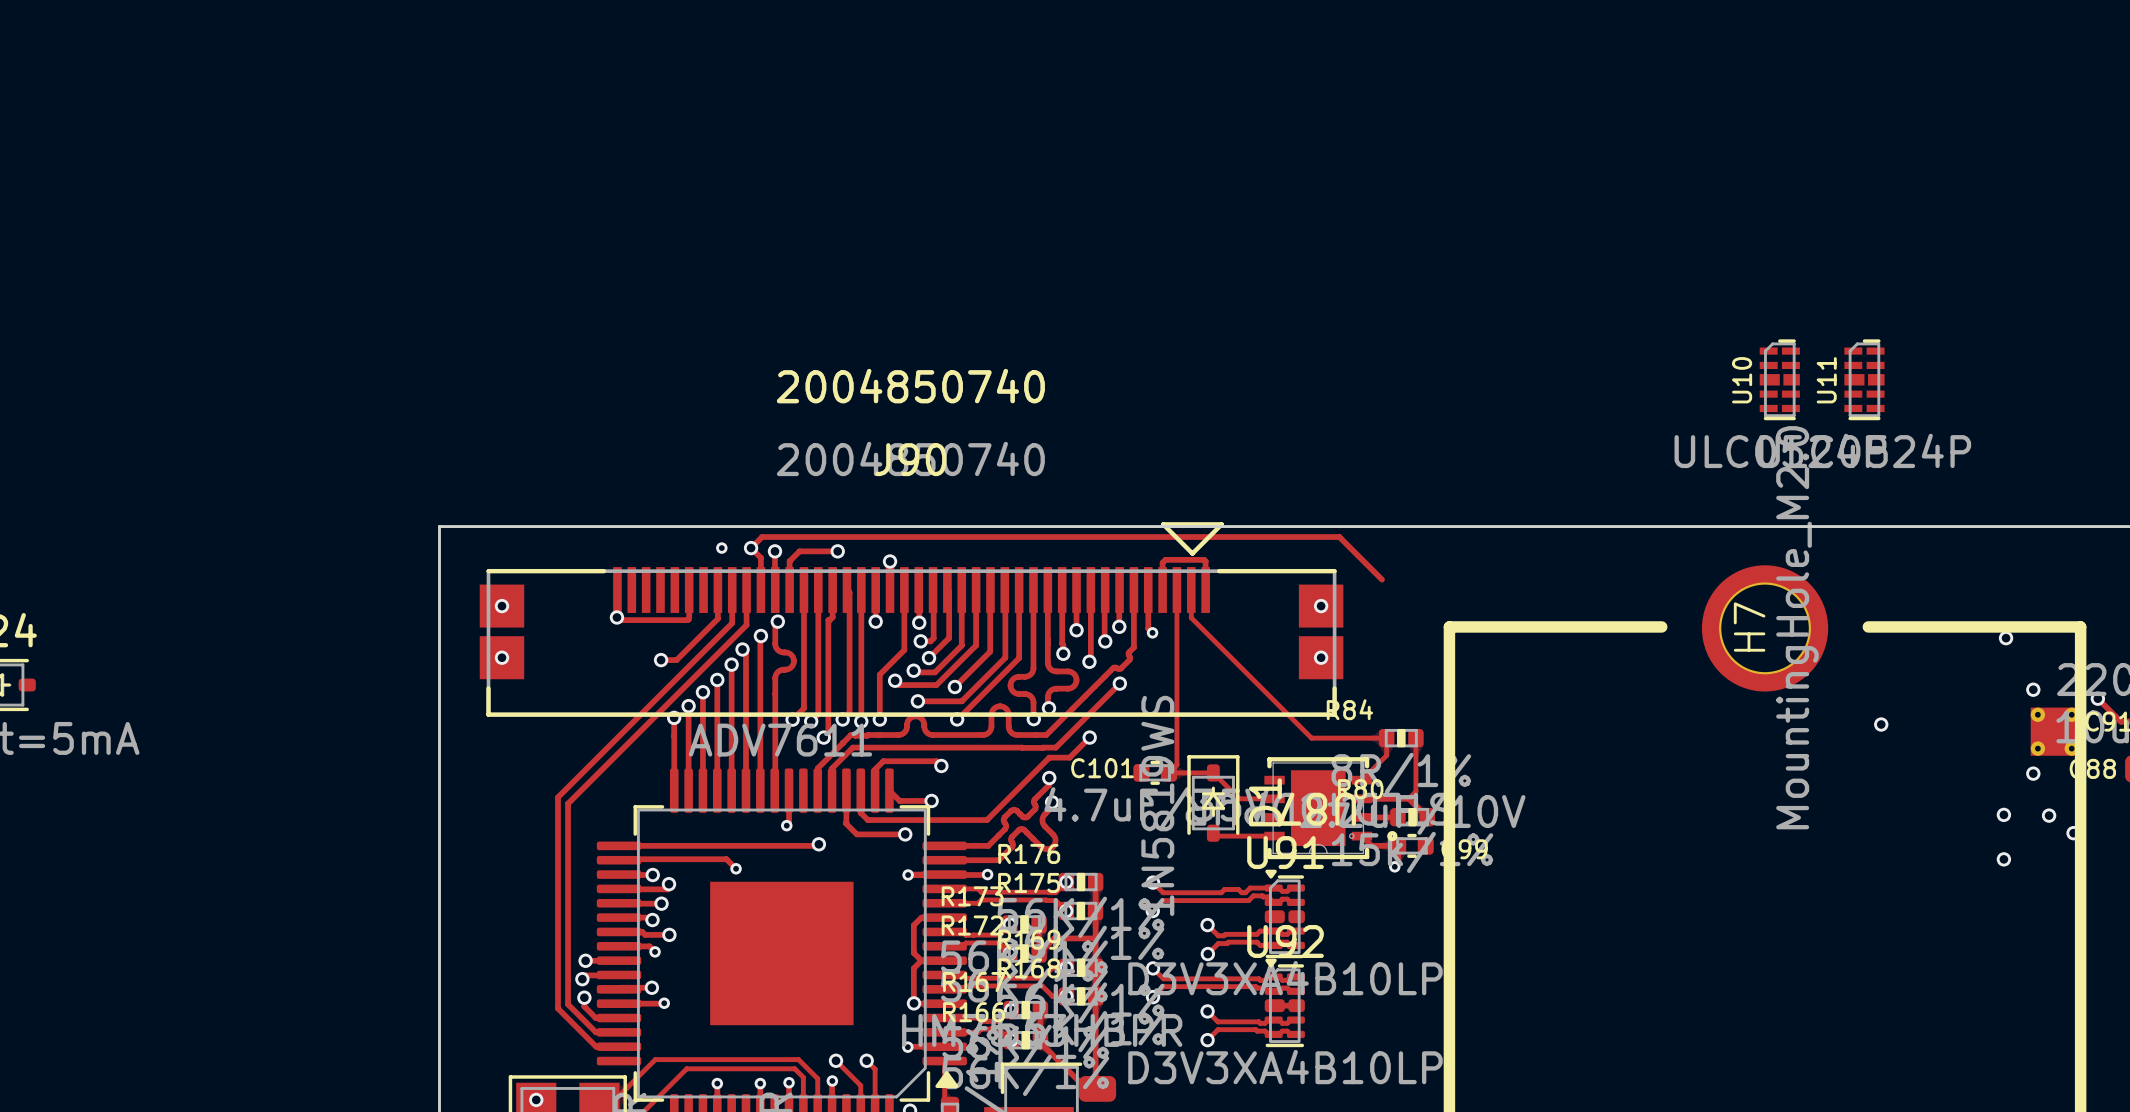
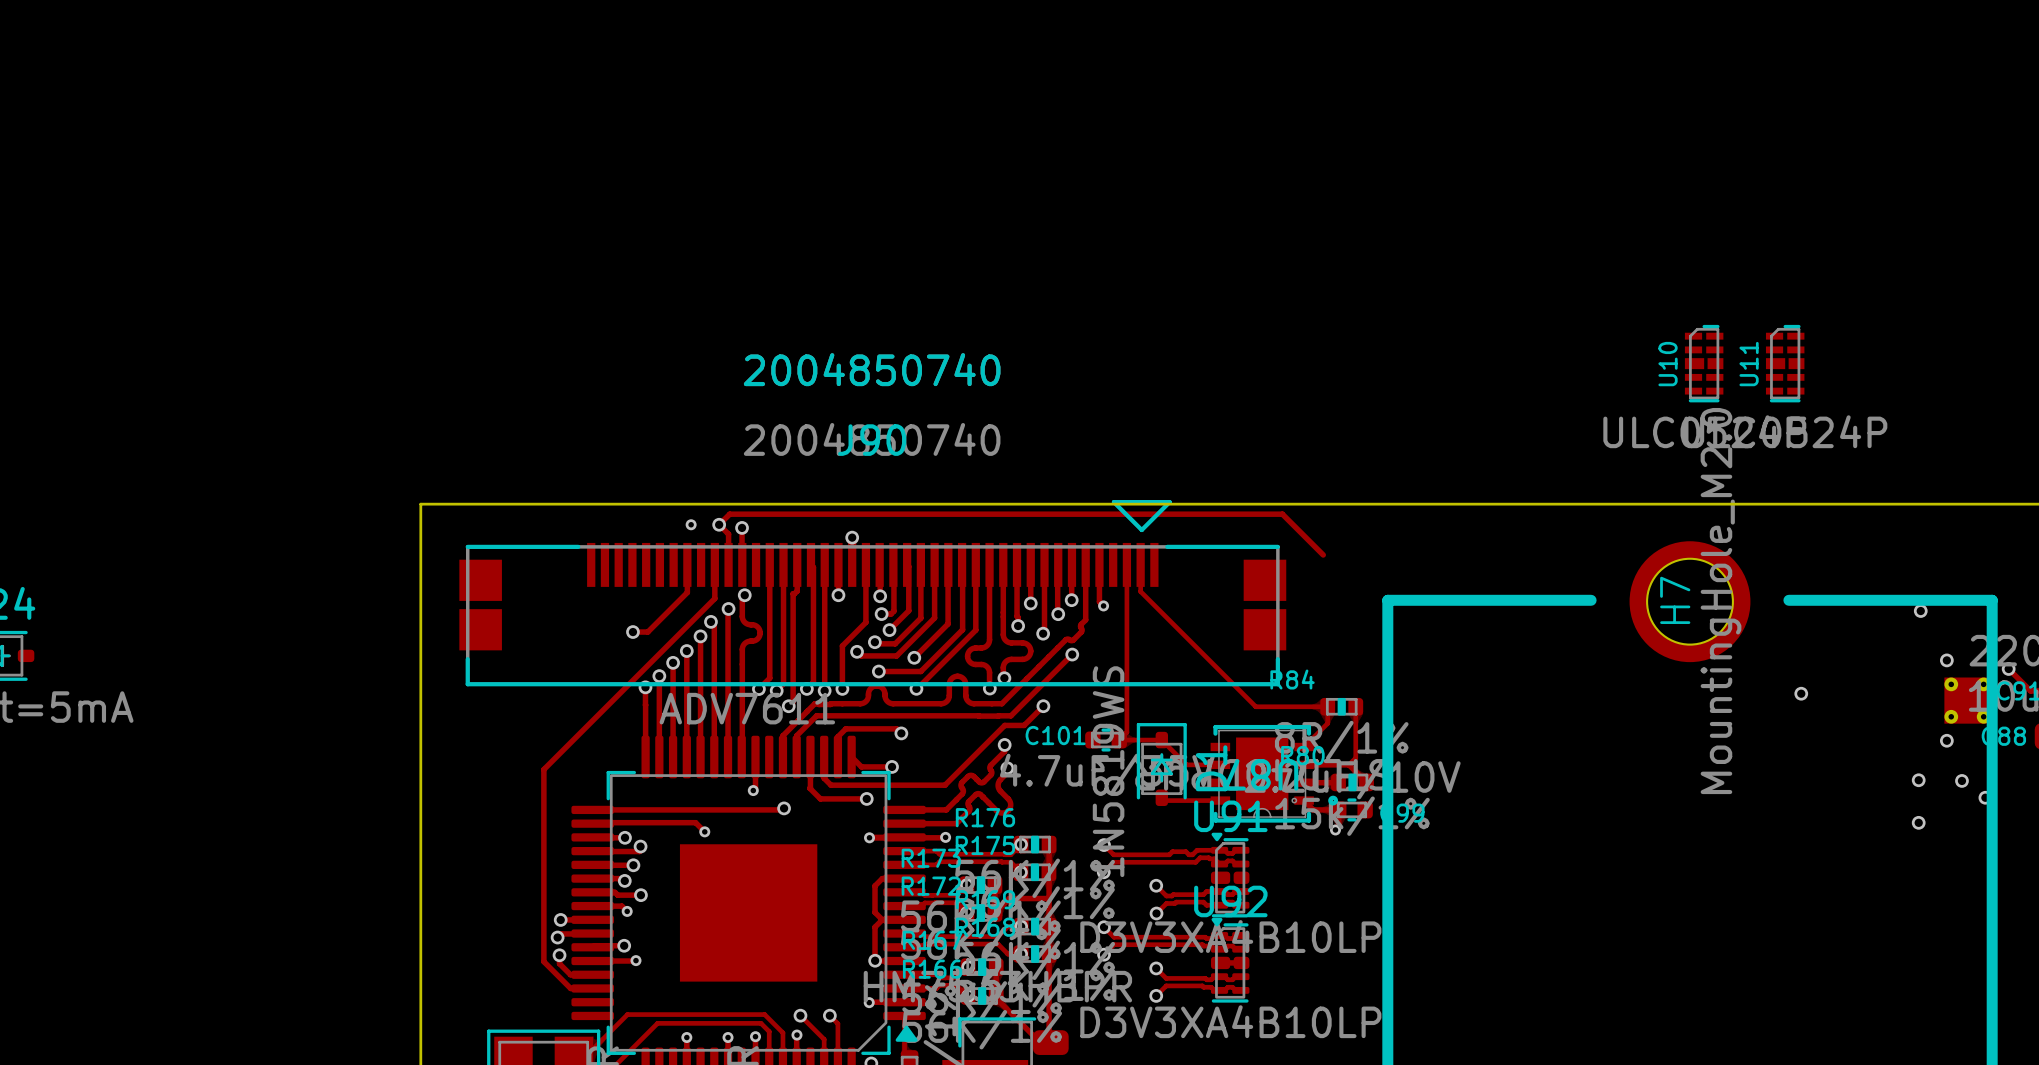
track: (837, 551) (799, 551) (789, 561) (789, 590) -> none
via: (837, 551) -> none
track: (617, 590) (617, 617) (620, 620) (687, 620) (689, 590) -> none
track: (732, 590) (732, 623) (557, 797) (557, 1008) (596, 1046) (619, 1046) -> none
track: (1162, 590) (1162, 562) (1165, 559) (1204, 559) (1205, 590) -> none
via: (501, 606) -> none
via: (1321, 606) -> none
via: (616, 617) -> none
via: (501, 657) -> none
via: (1321, 657) -> none
via: (536, 1099) -> none

